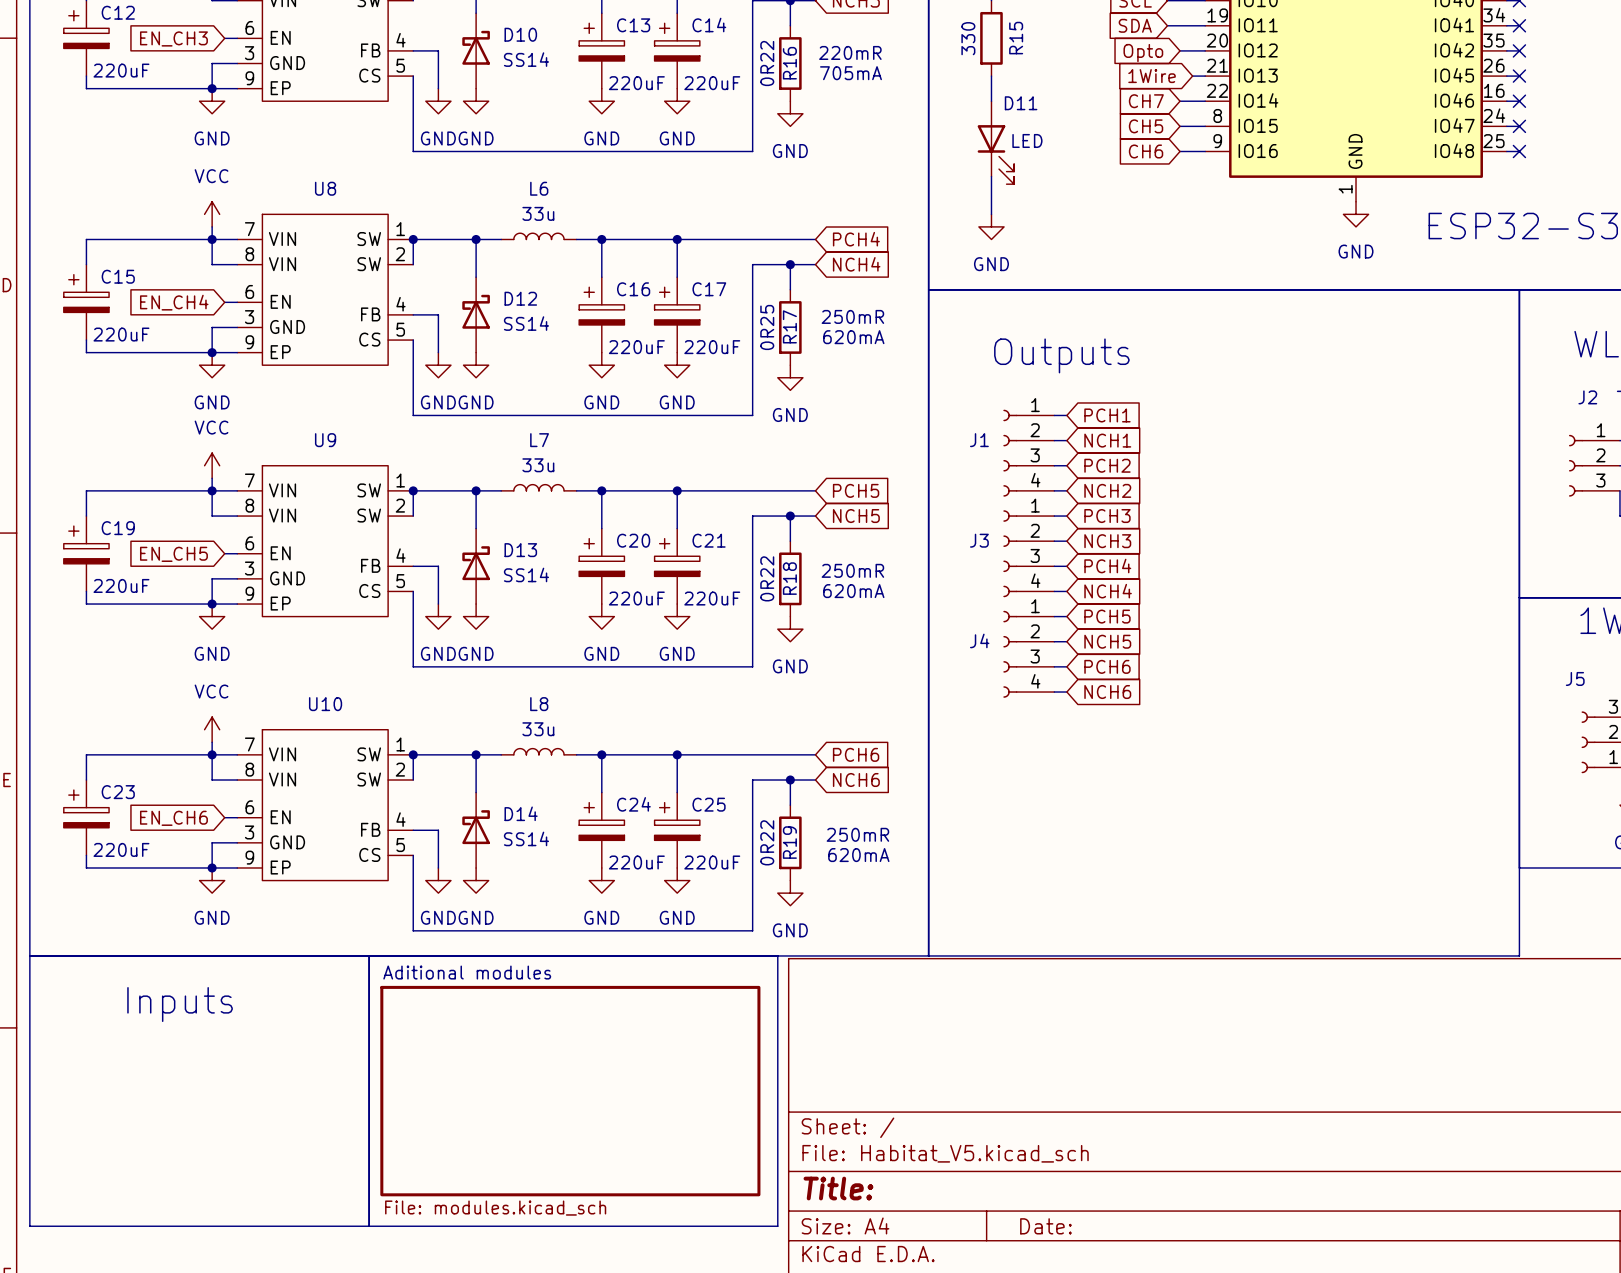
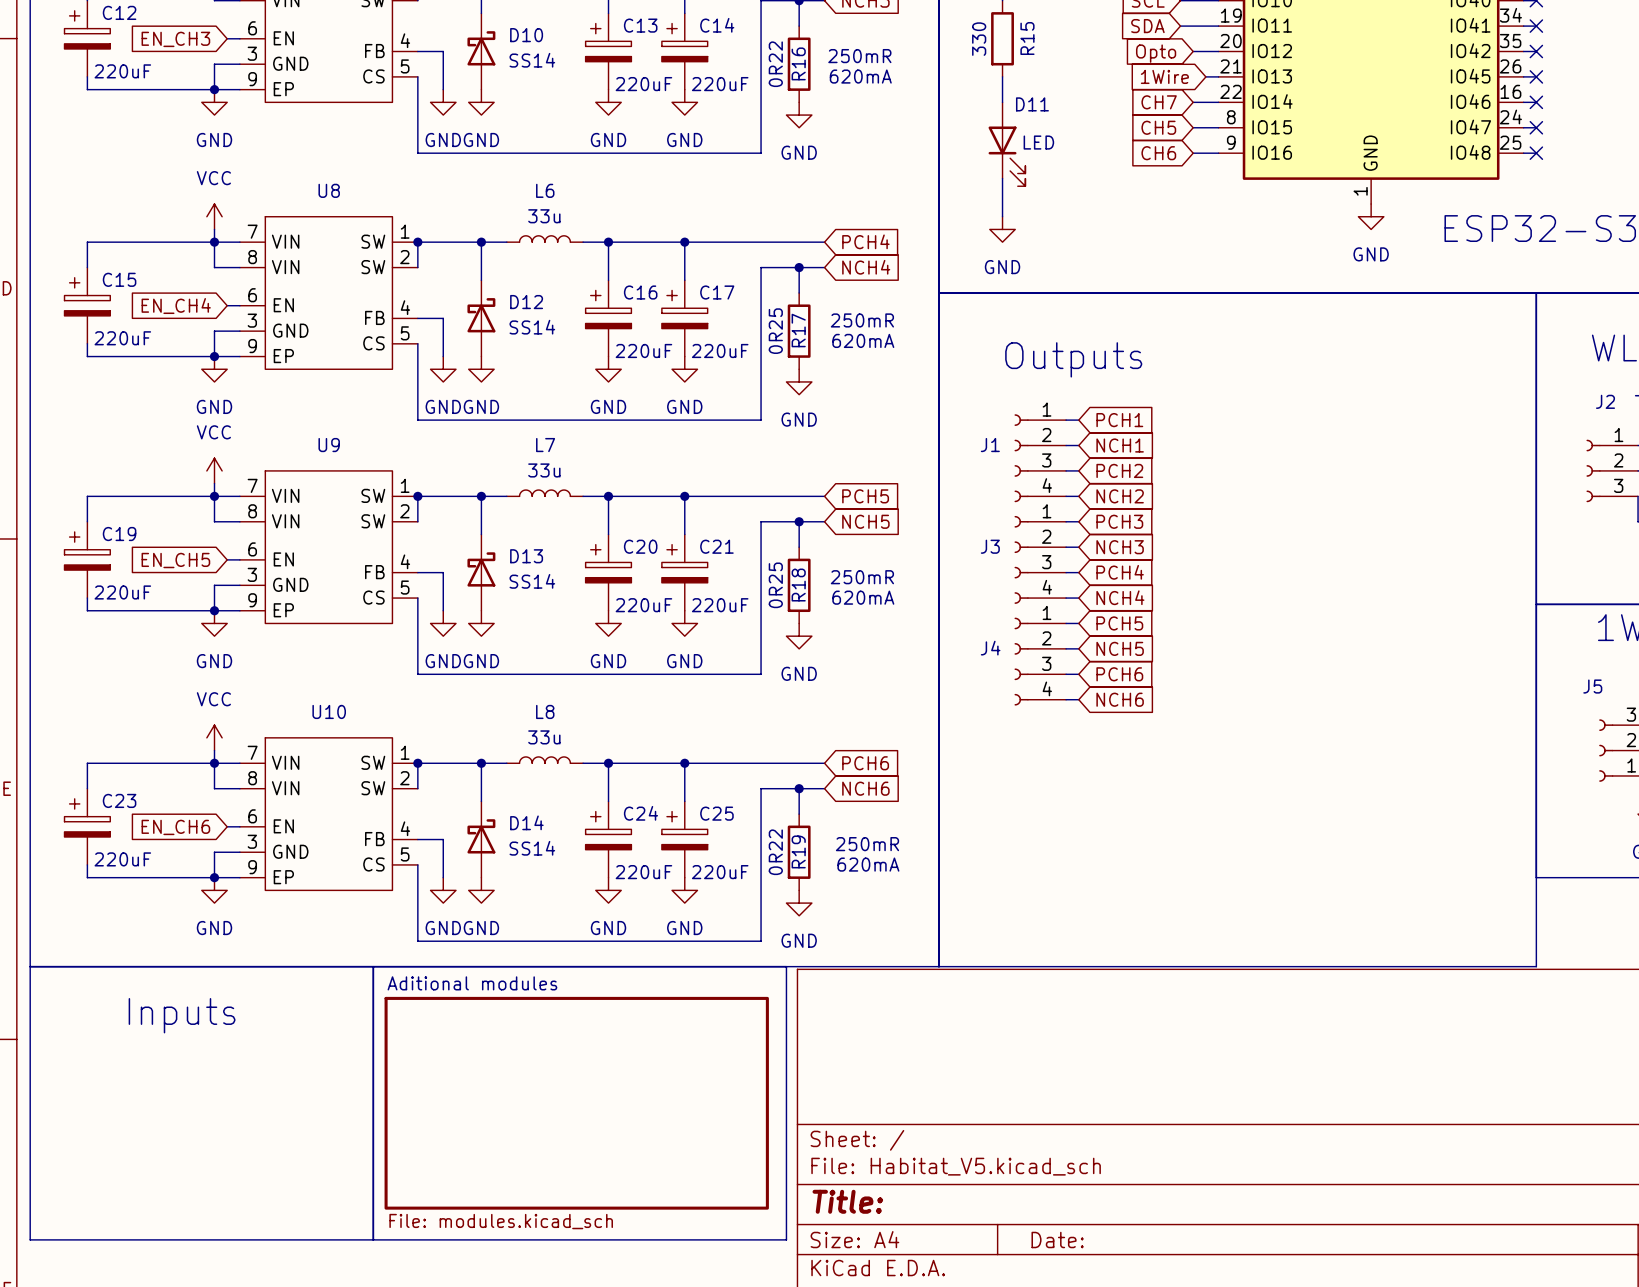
text: 220mR (850, 52) -> 250mR (859, 56)
text: 705mA (850, 73) -> 620mA (860, 76)
R18 value: 0R22 (767, 578) -> 0R25 (775, 585)

